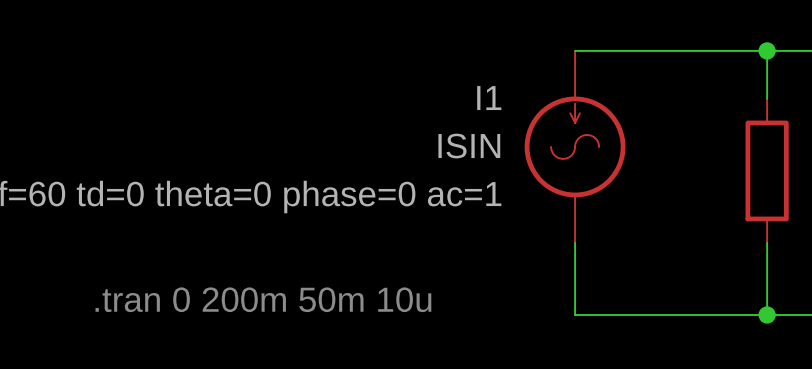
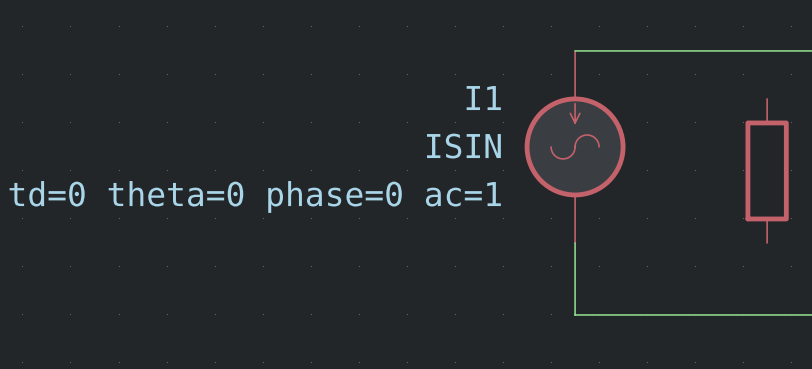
wire: (767, 50) (767, 98) -> none
junction: (767, 50) -> none
wire: (767, 242) (767, 314) -> none
text: .tran 0 200m 50m 10u (263, 299) -> none
junction: (767, 314) -> none

